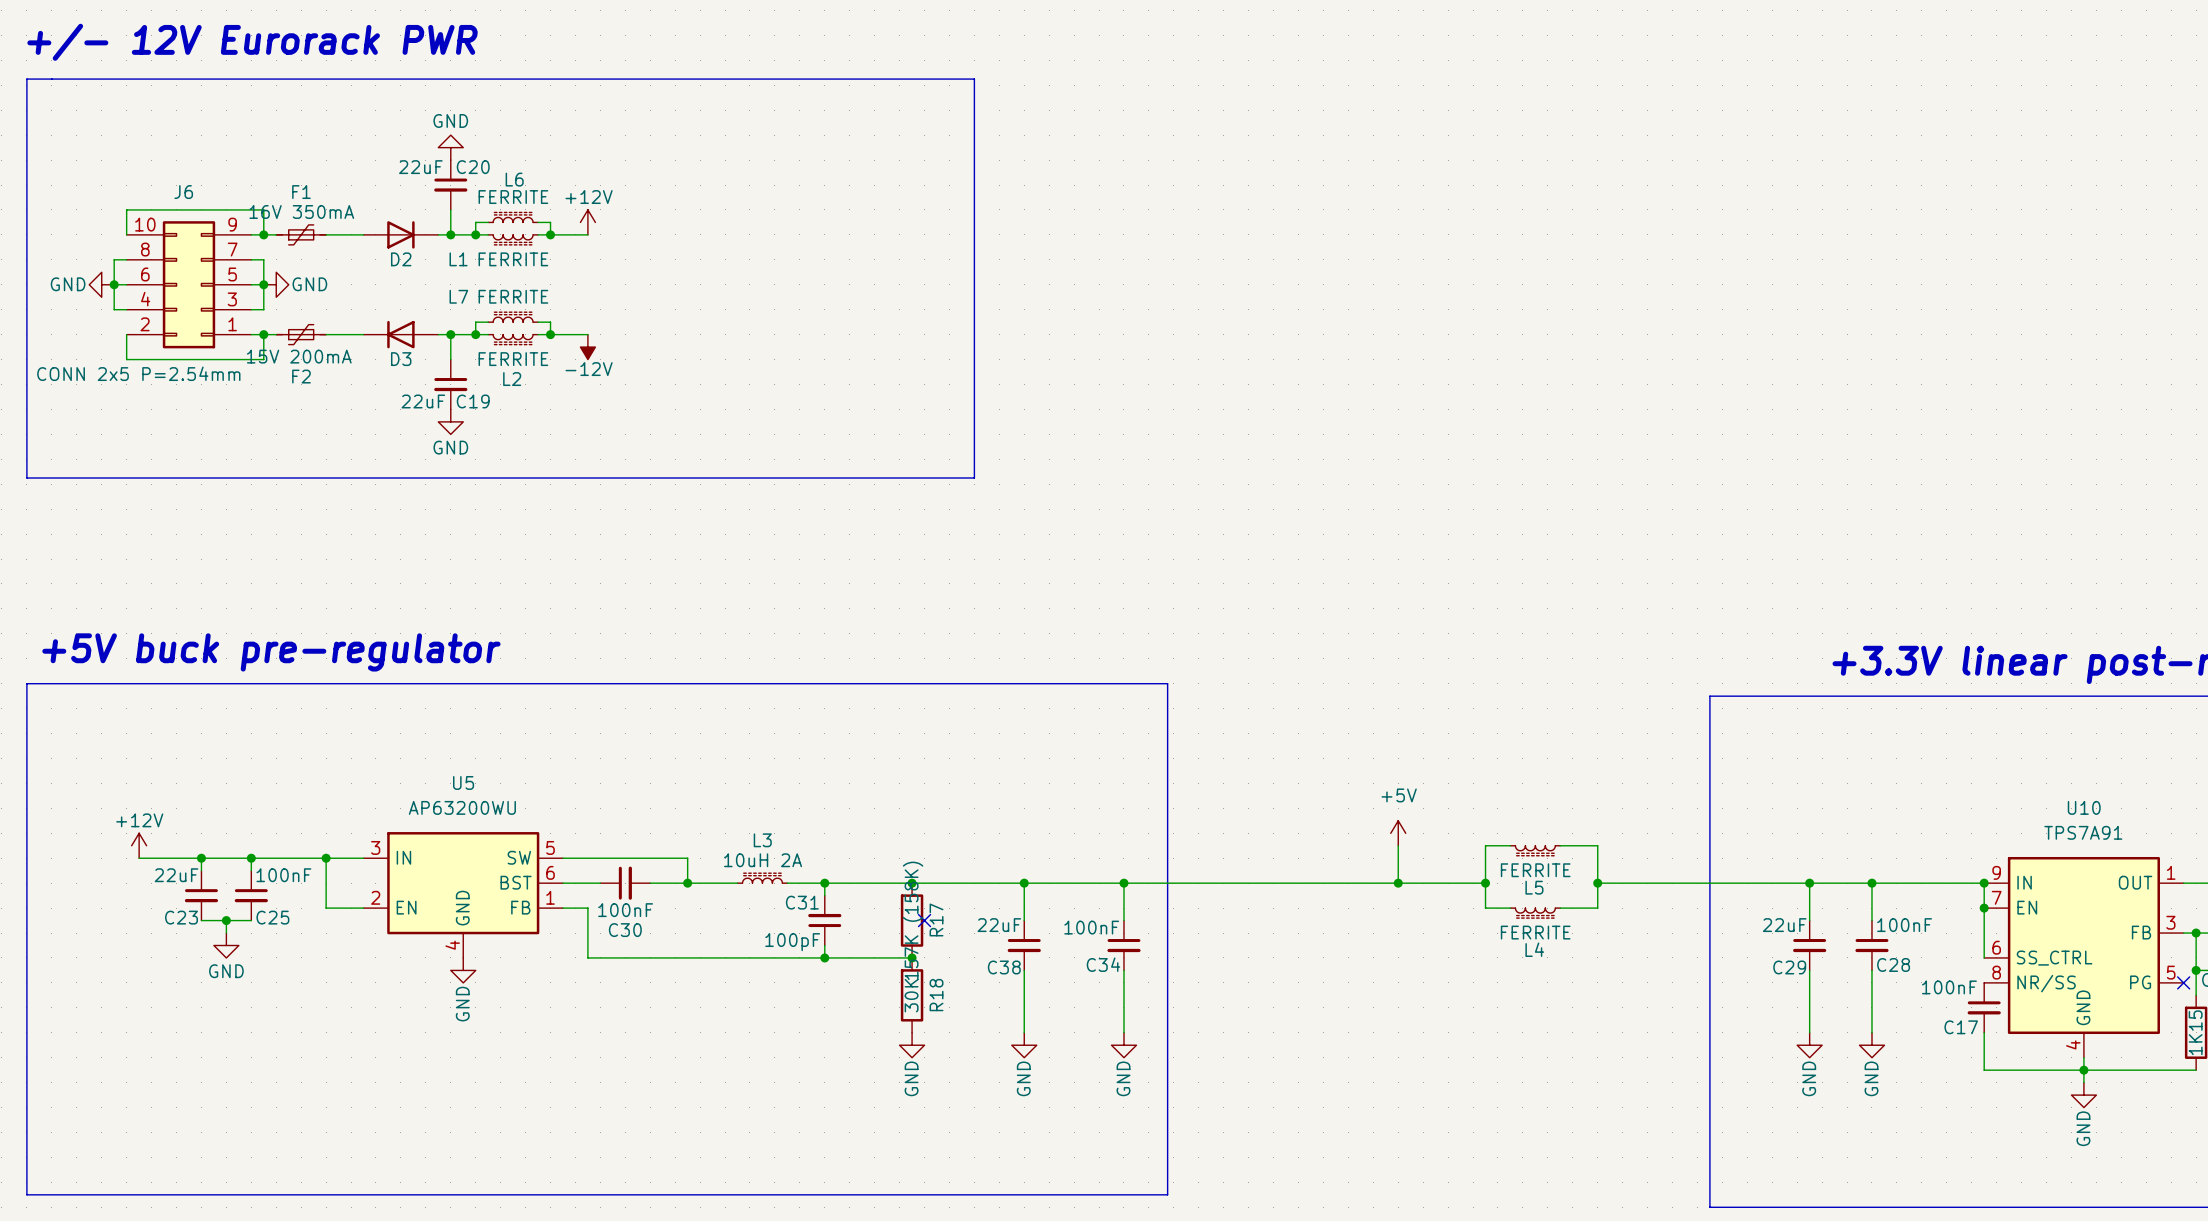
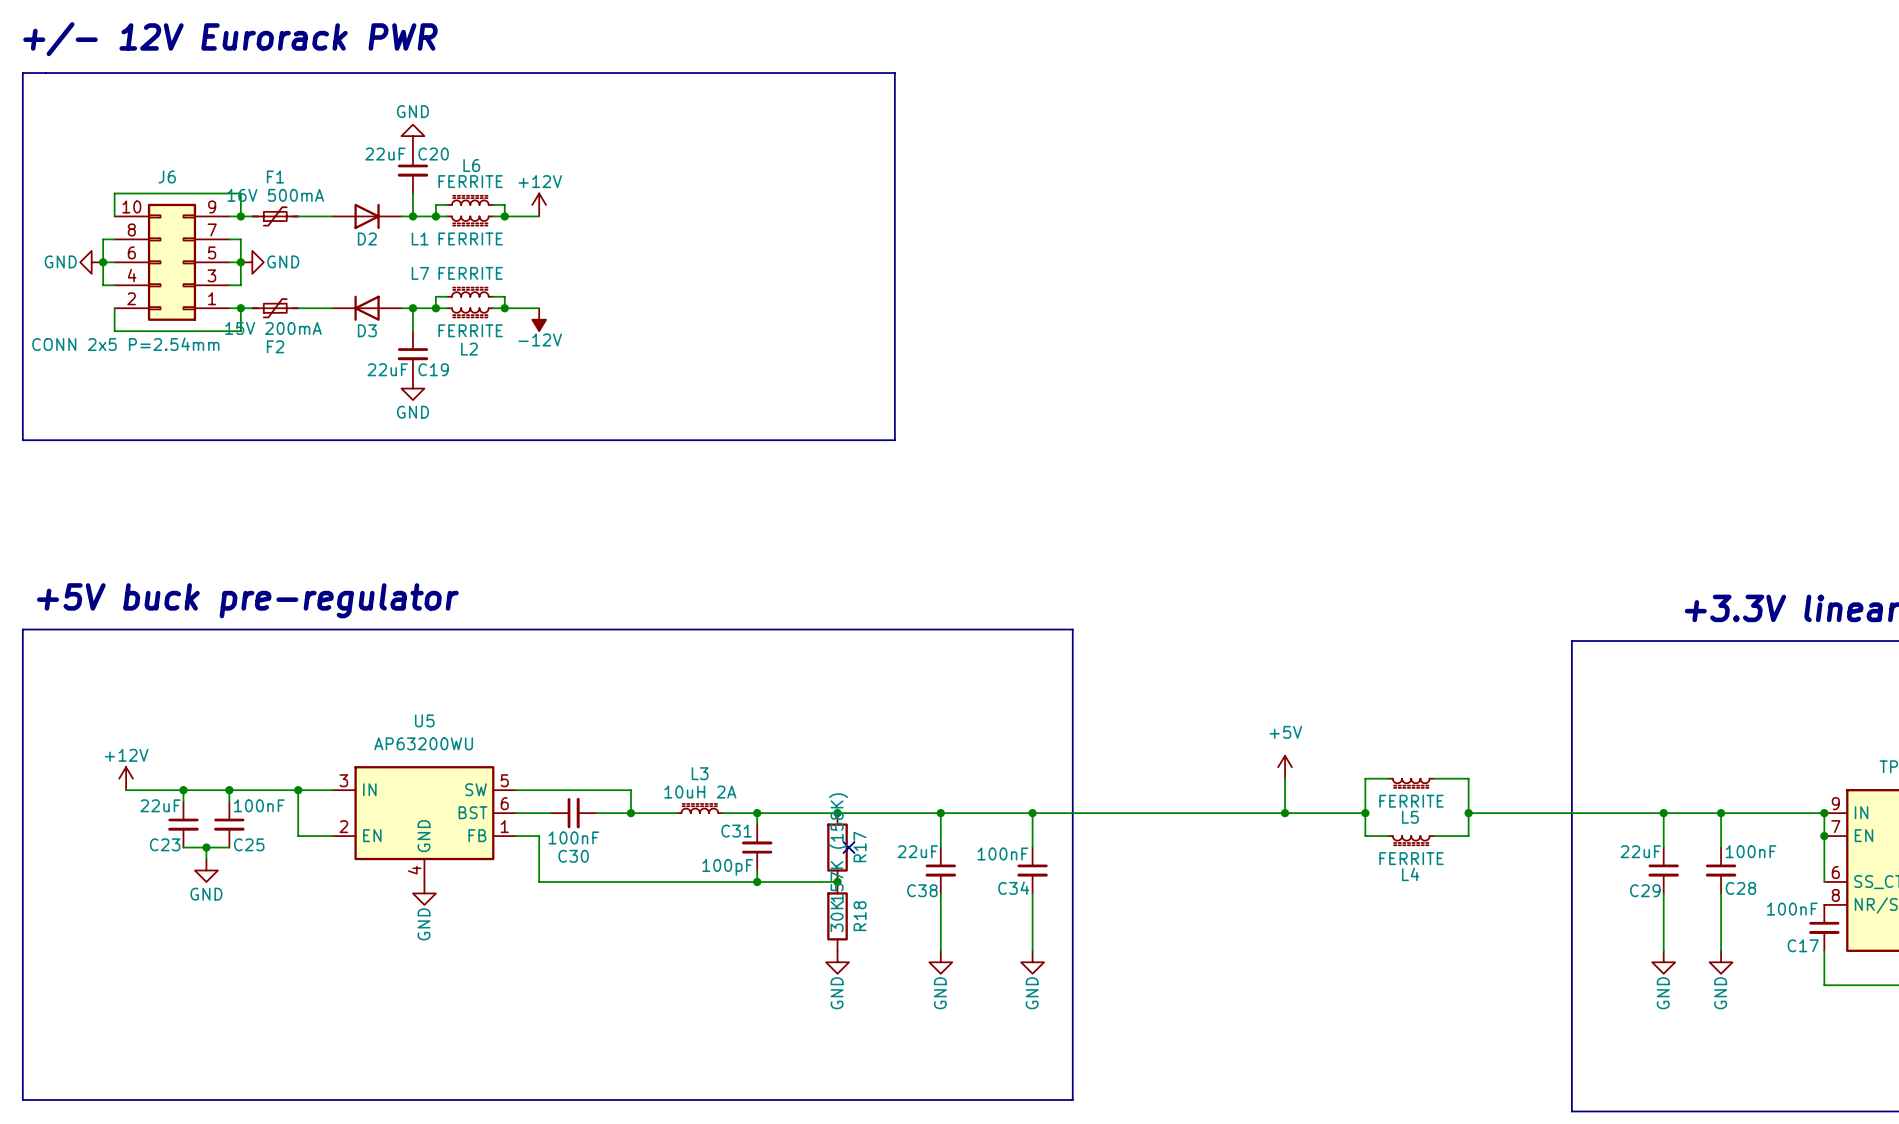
F1 value: 16V 350mA (301, 211) -> 16V 500mA (275, 195)

